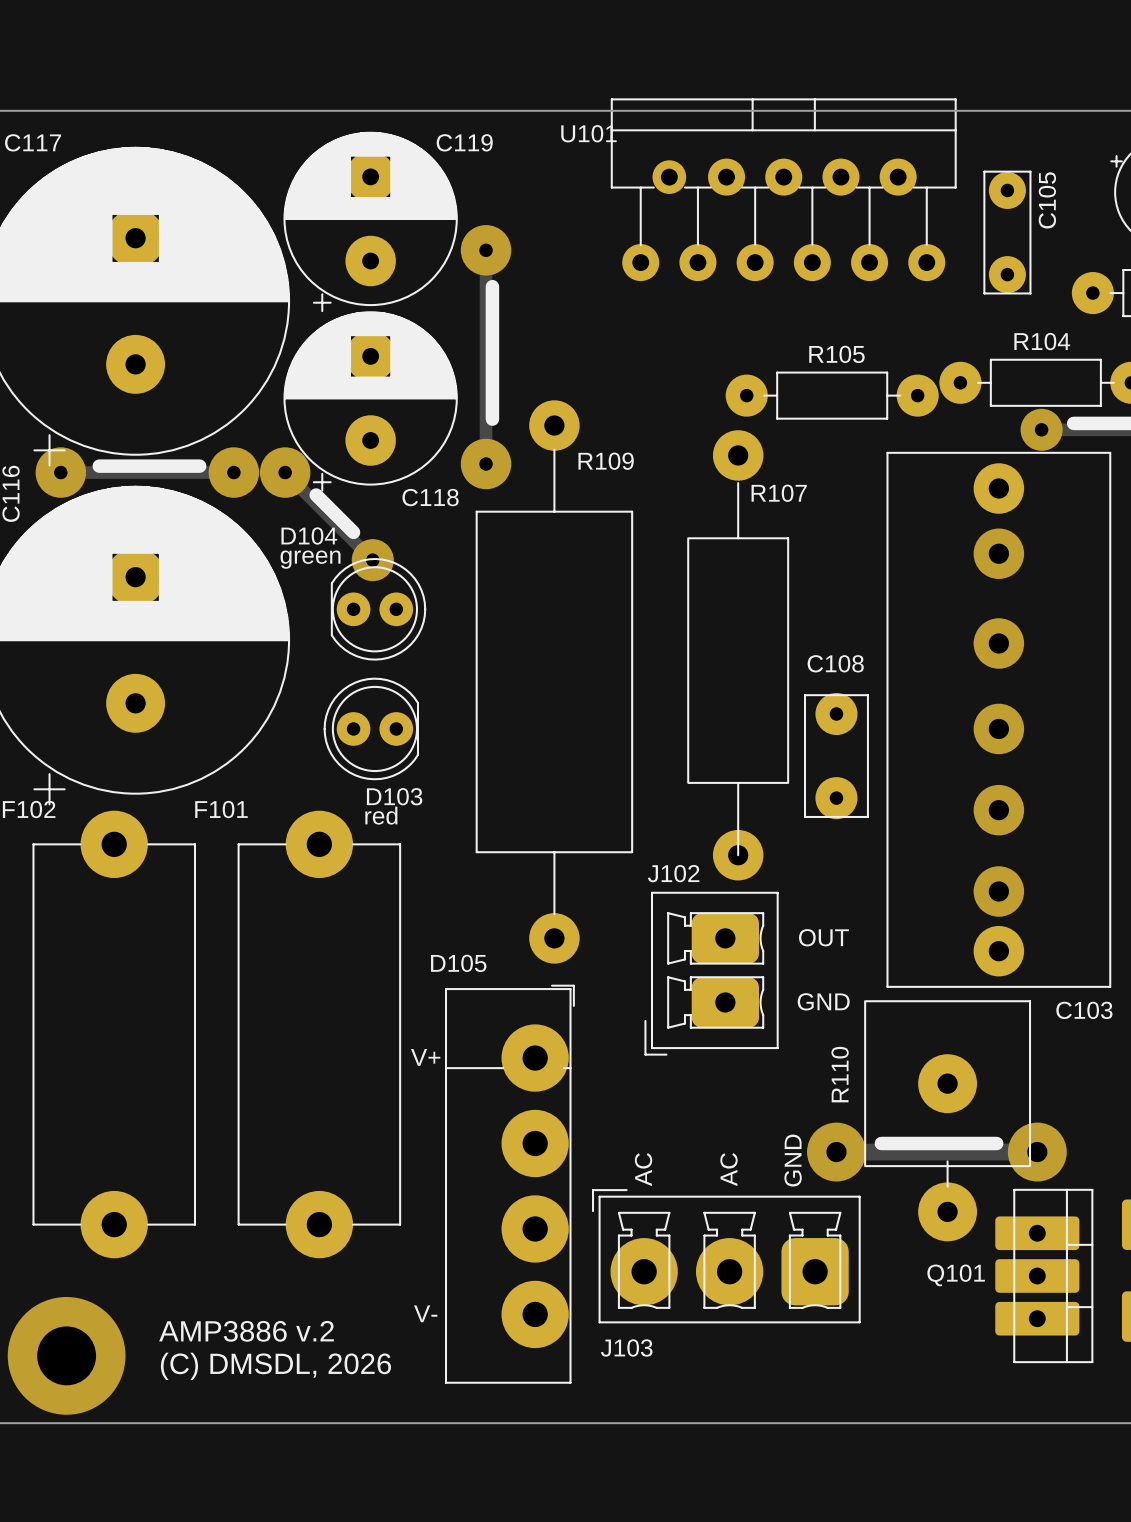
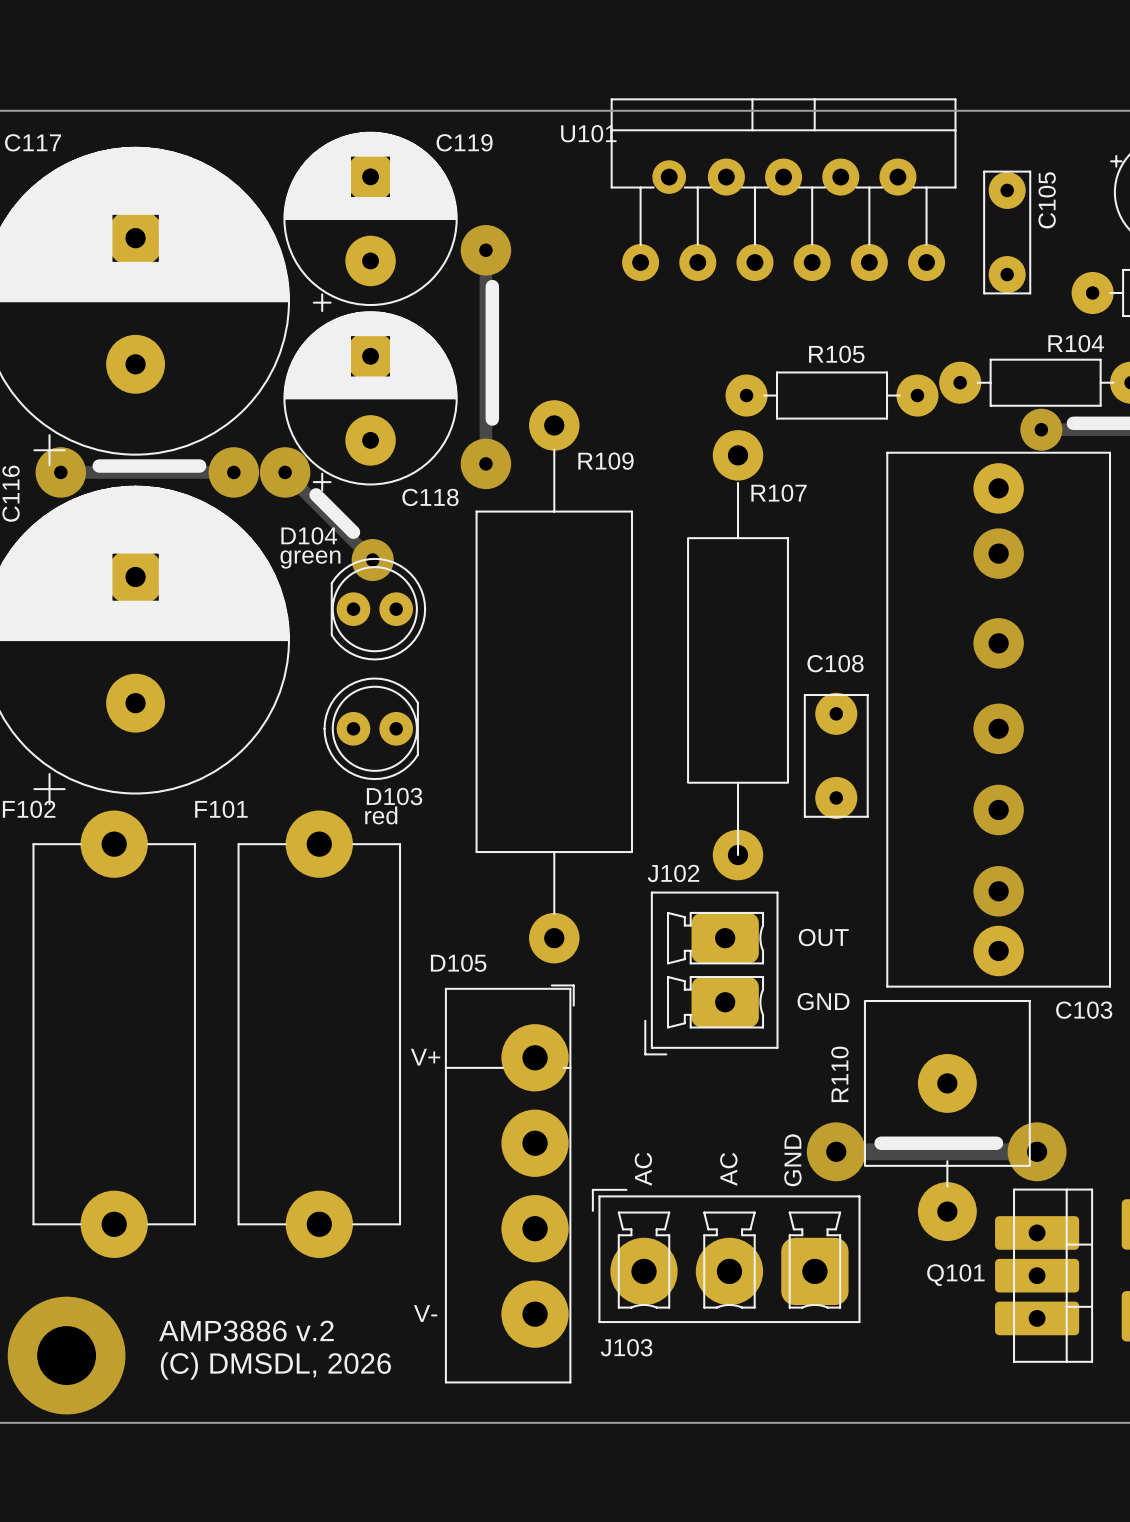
R104 name position: R104 (1042, 341) -> R104 (1076, 343)

